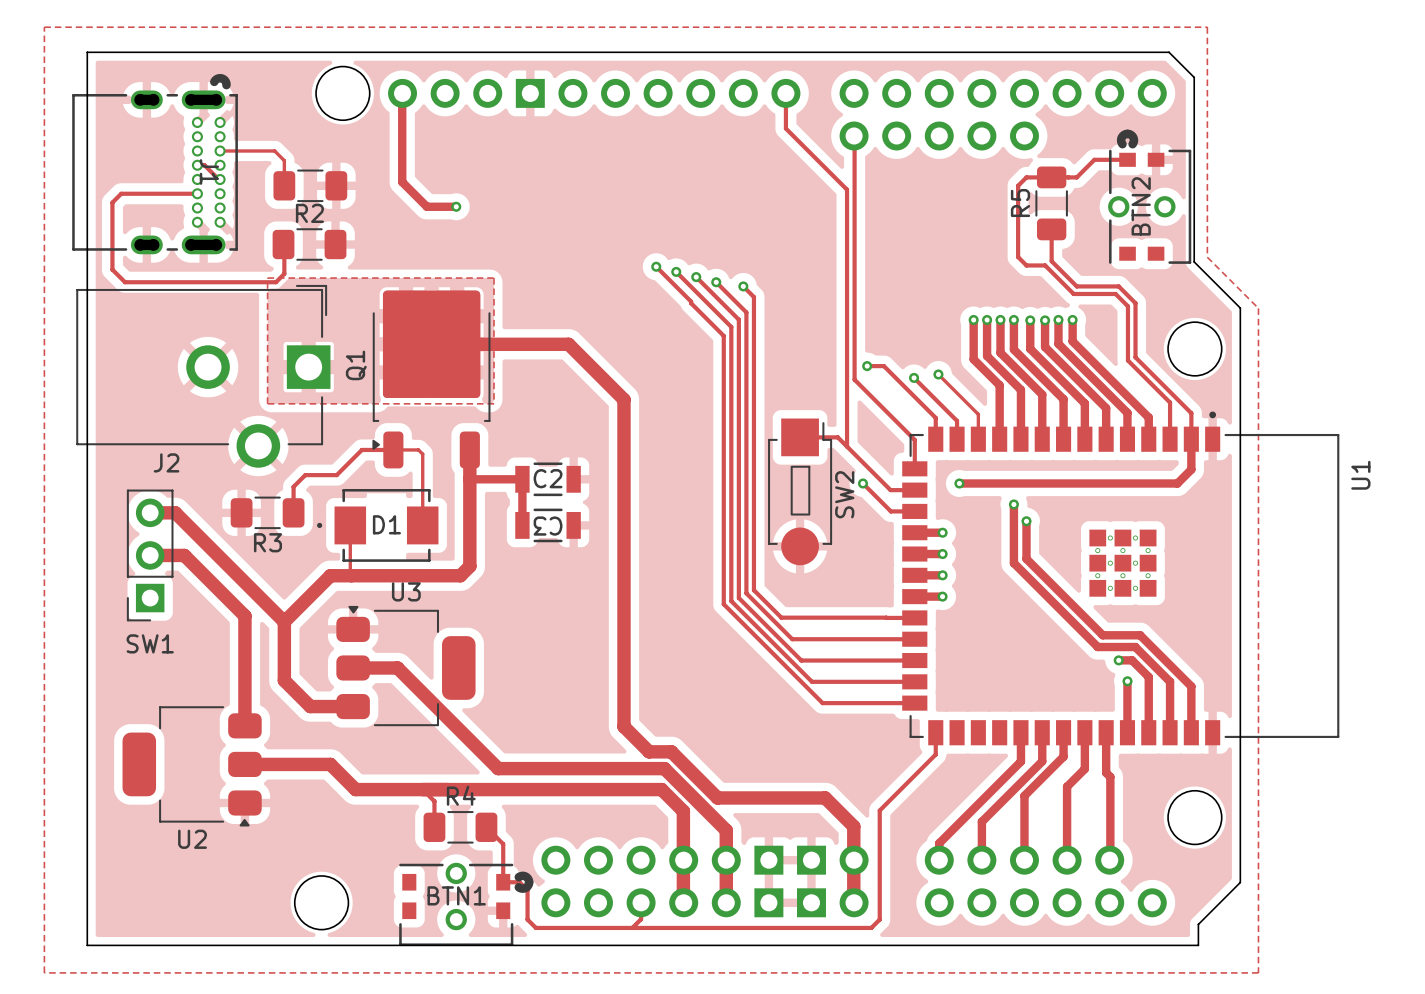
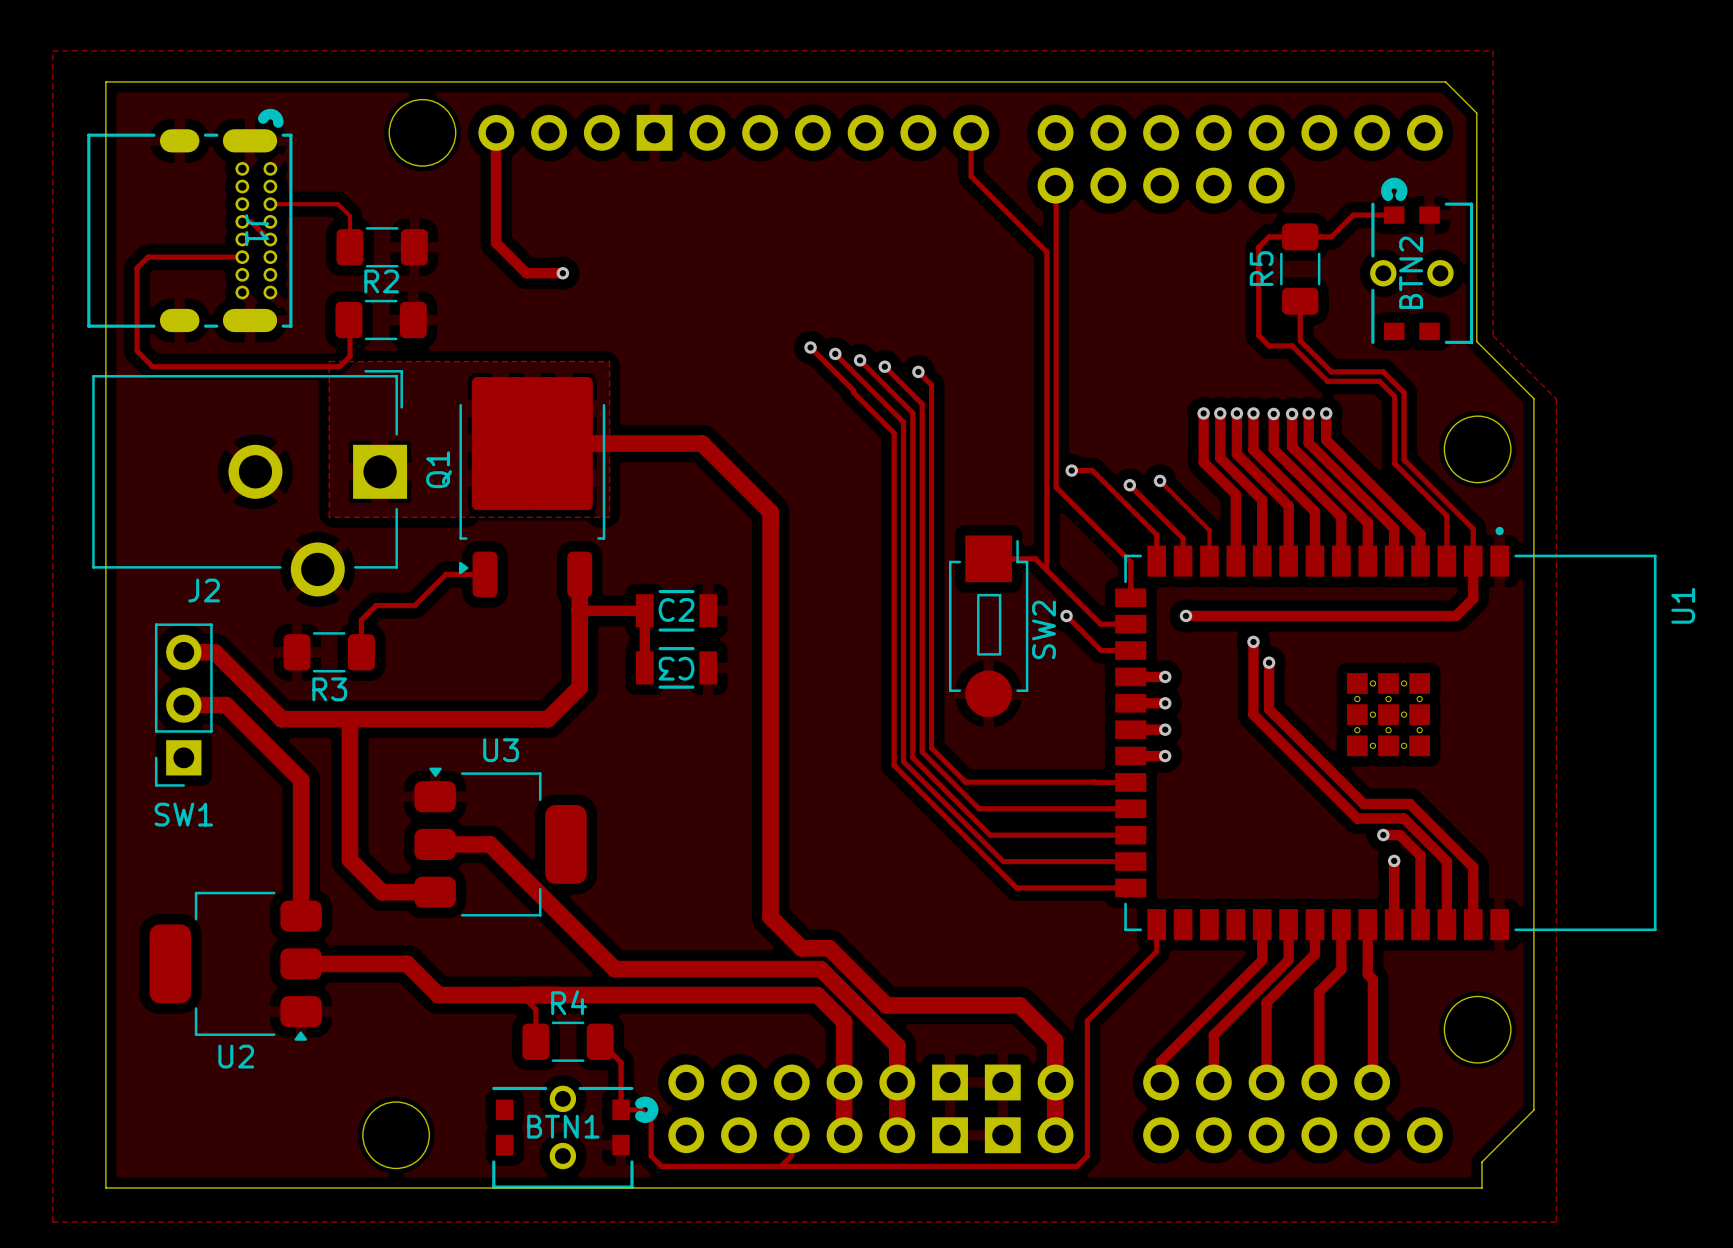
track: (393, 449) (418, 449) (422, 454) (422, 525) -> none
track: (350, 525) (351, 575) -> none
D1: (377, 525) -> none
track: (469, 541) (469, 566) (460, 575) (330, 575) (284, 621) (229, 566) -> (579, 687) (547, 719) (281, 719)
track: none -> (349, 719) (349, 787)

